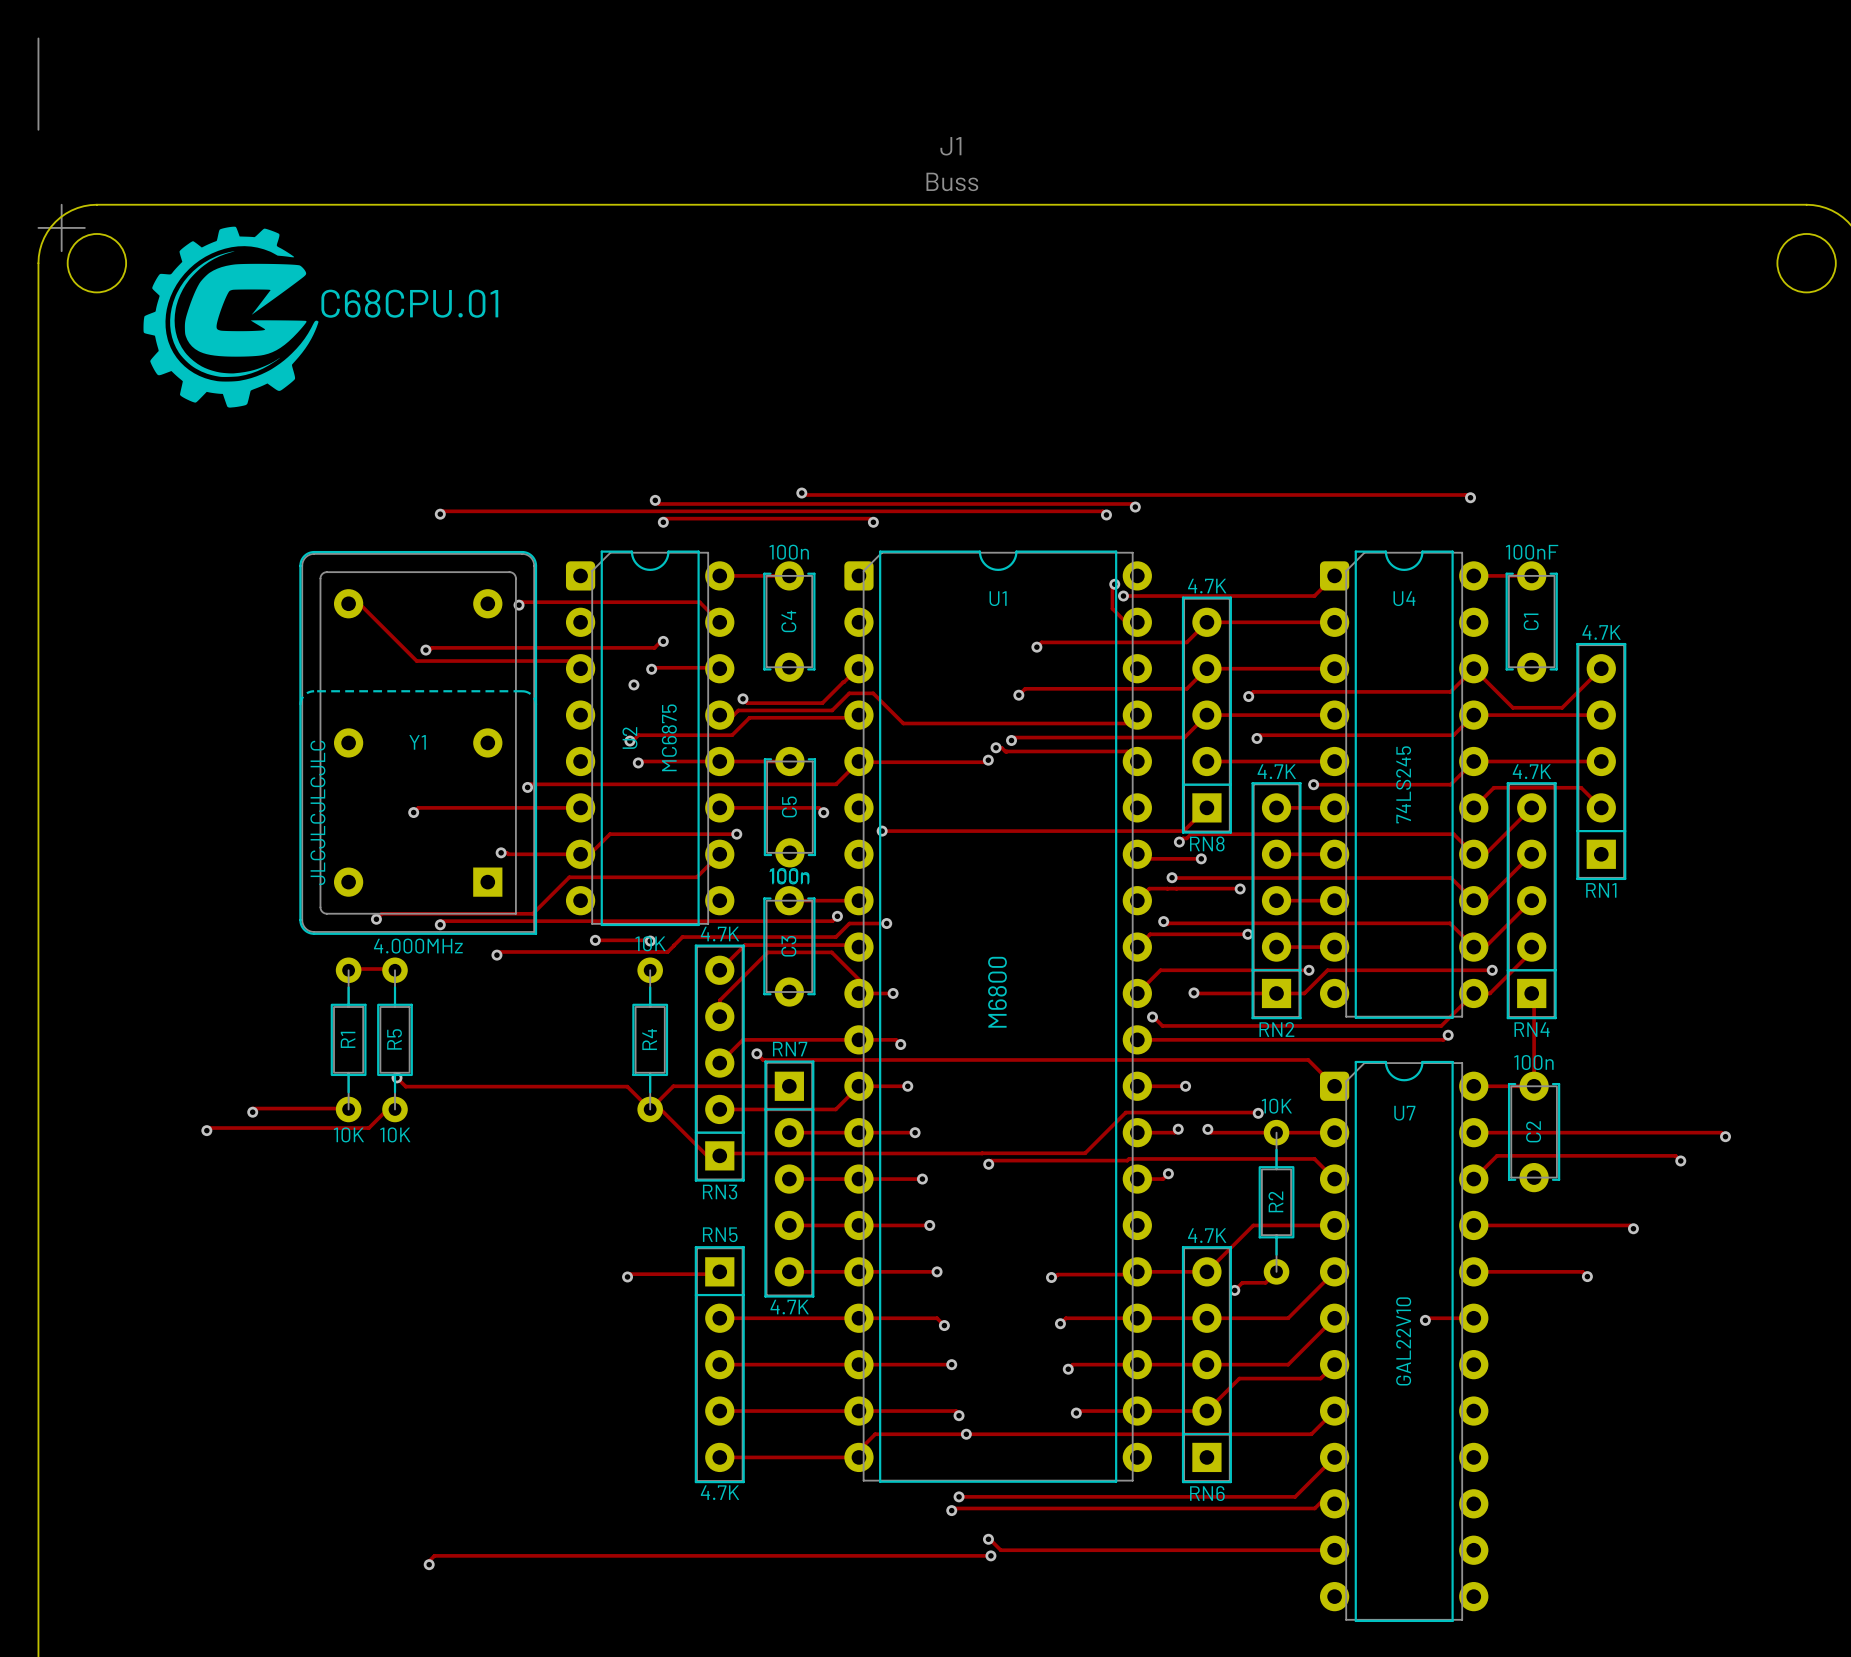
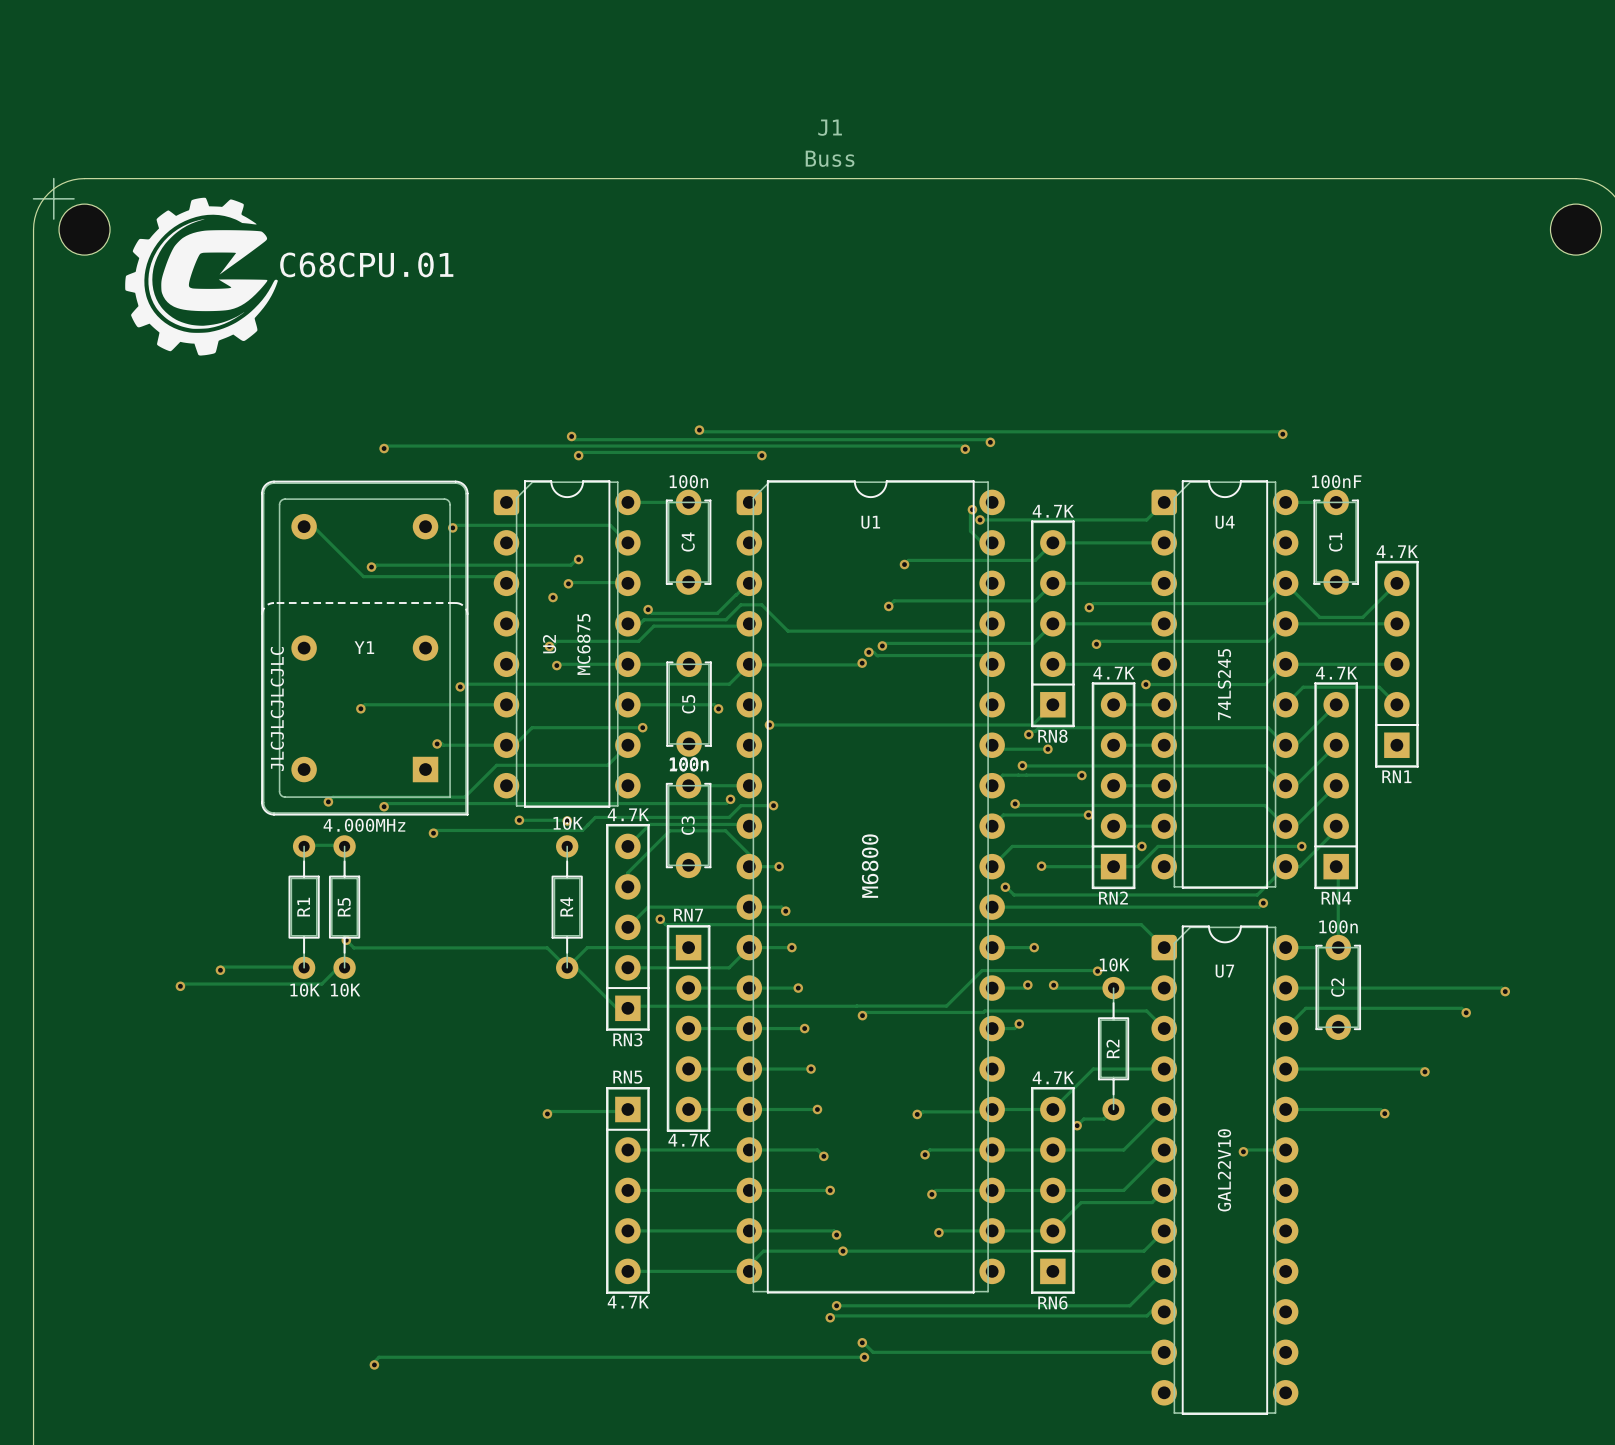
line: (38, 38) (38, 129) -> none

